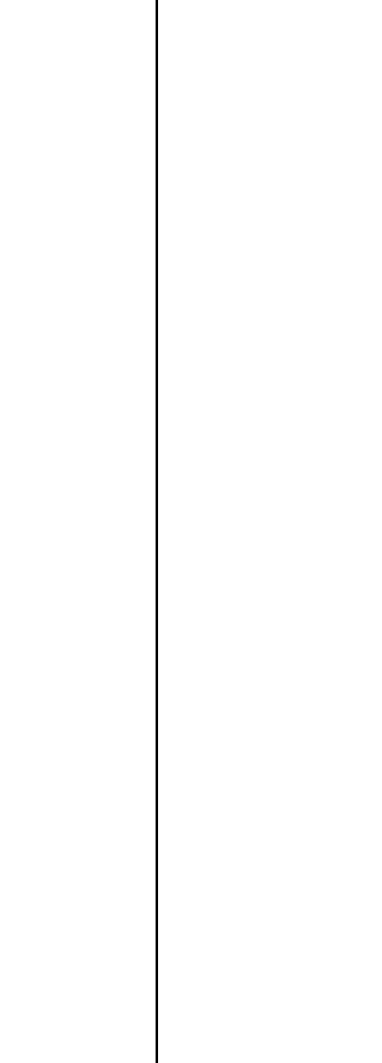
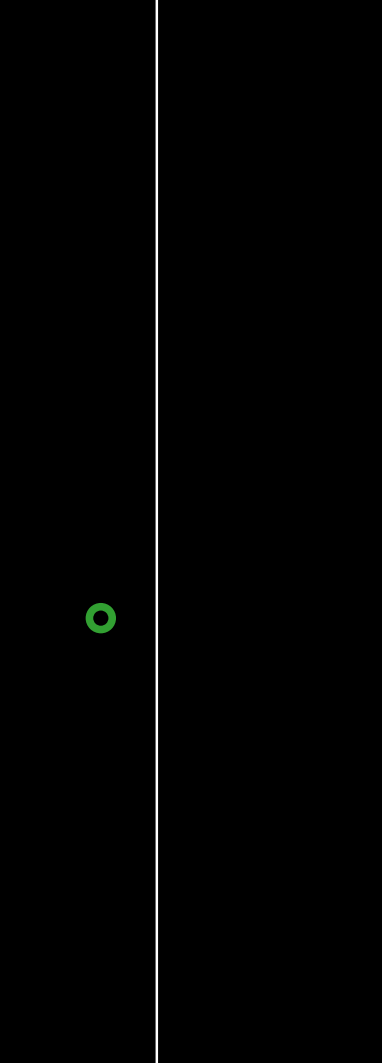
via: none -> (100, 618)

